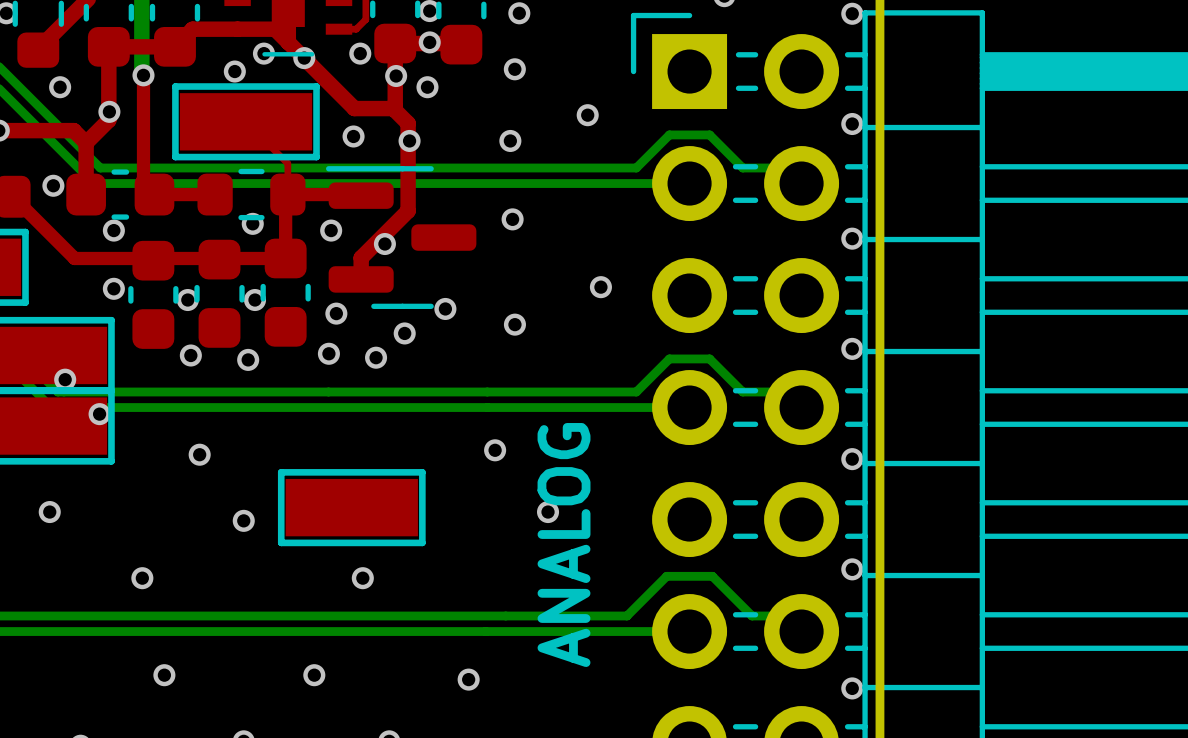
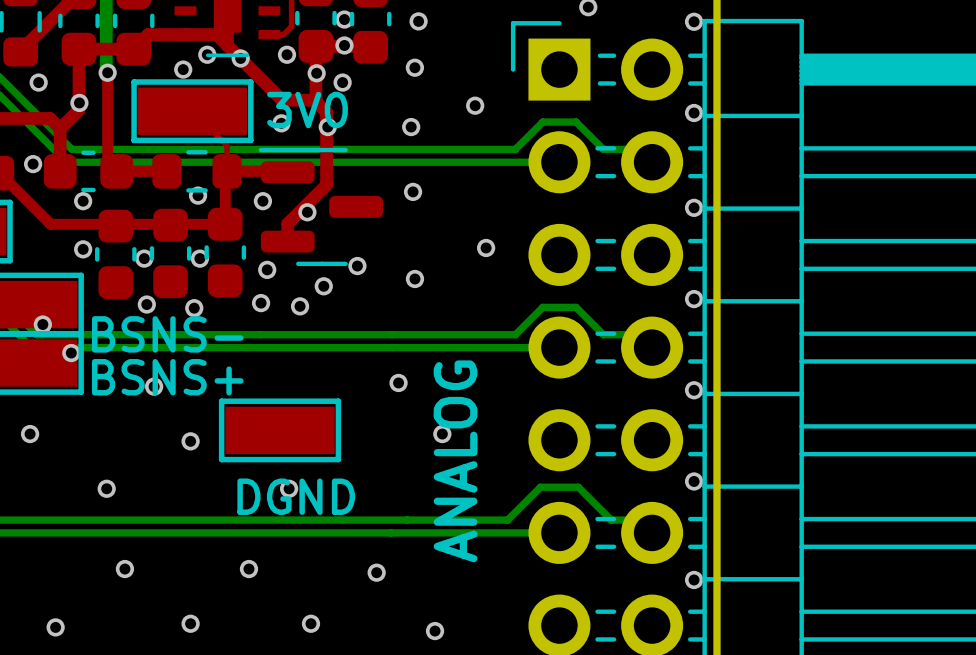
text: none -> 3V0 (307, 110)
text: none -> BSNS- (167, 334)
text: none -> BSNS+ (167, 377)
text: none -> DGND (296, 496)

